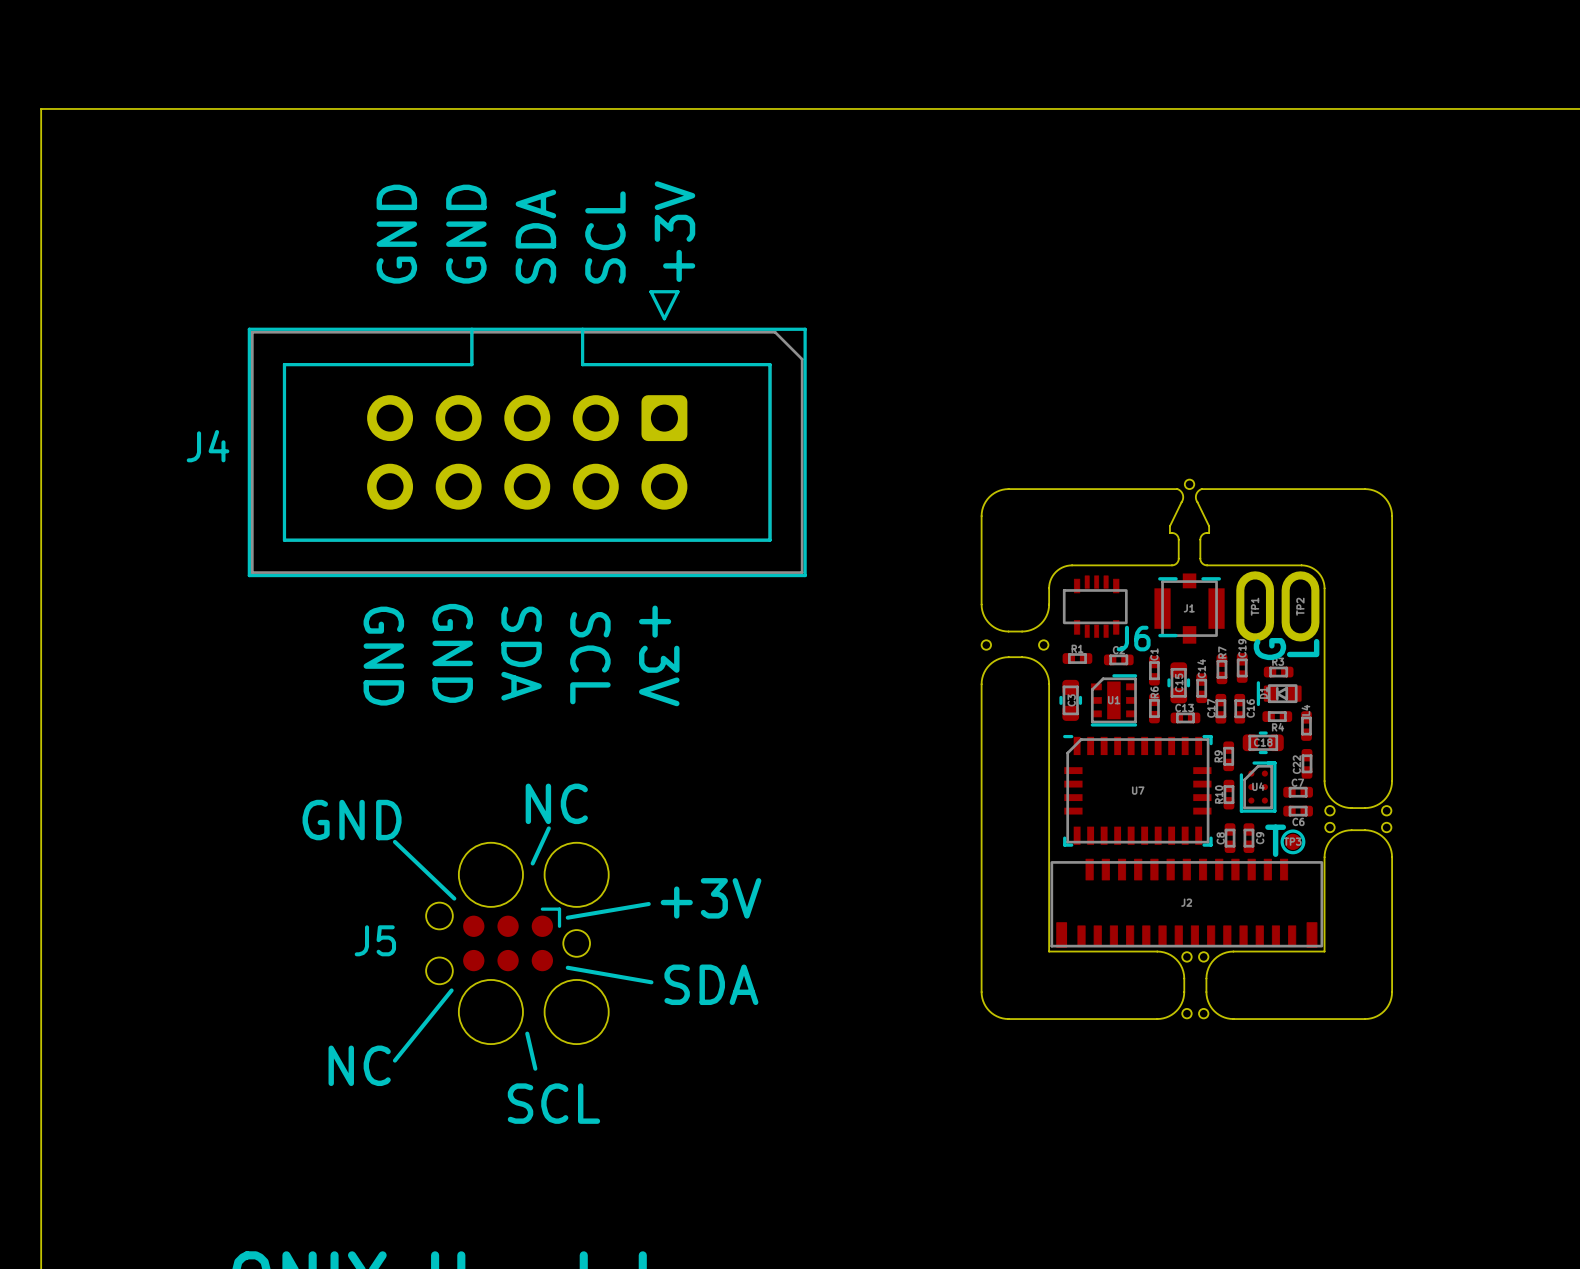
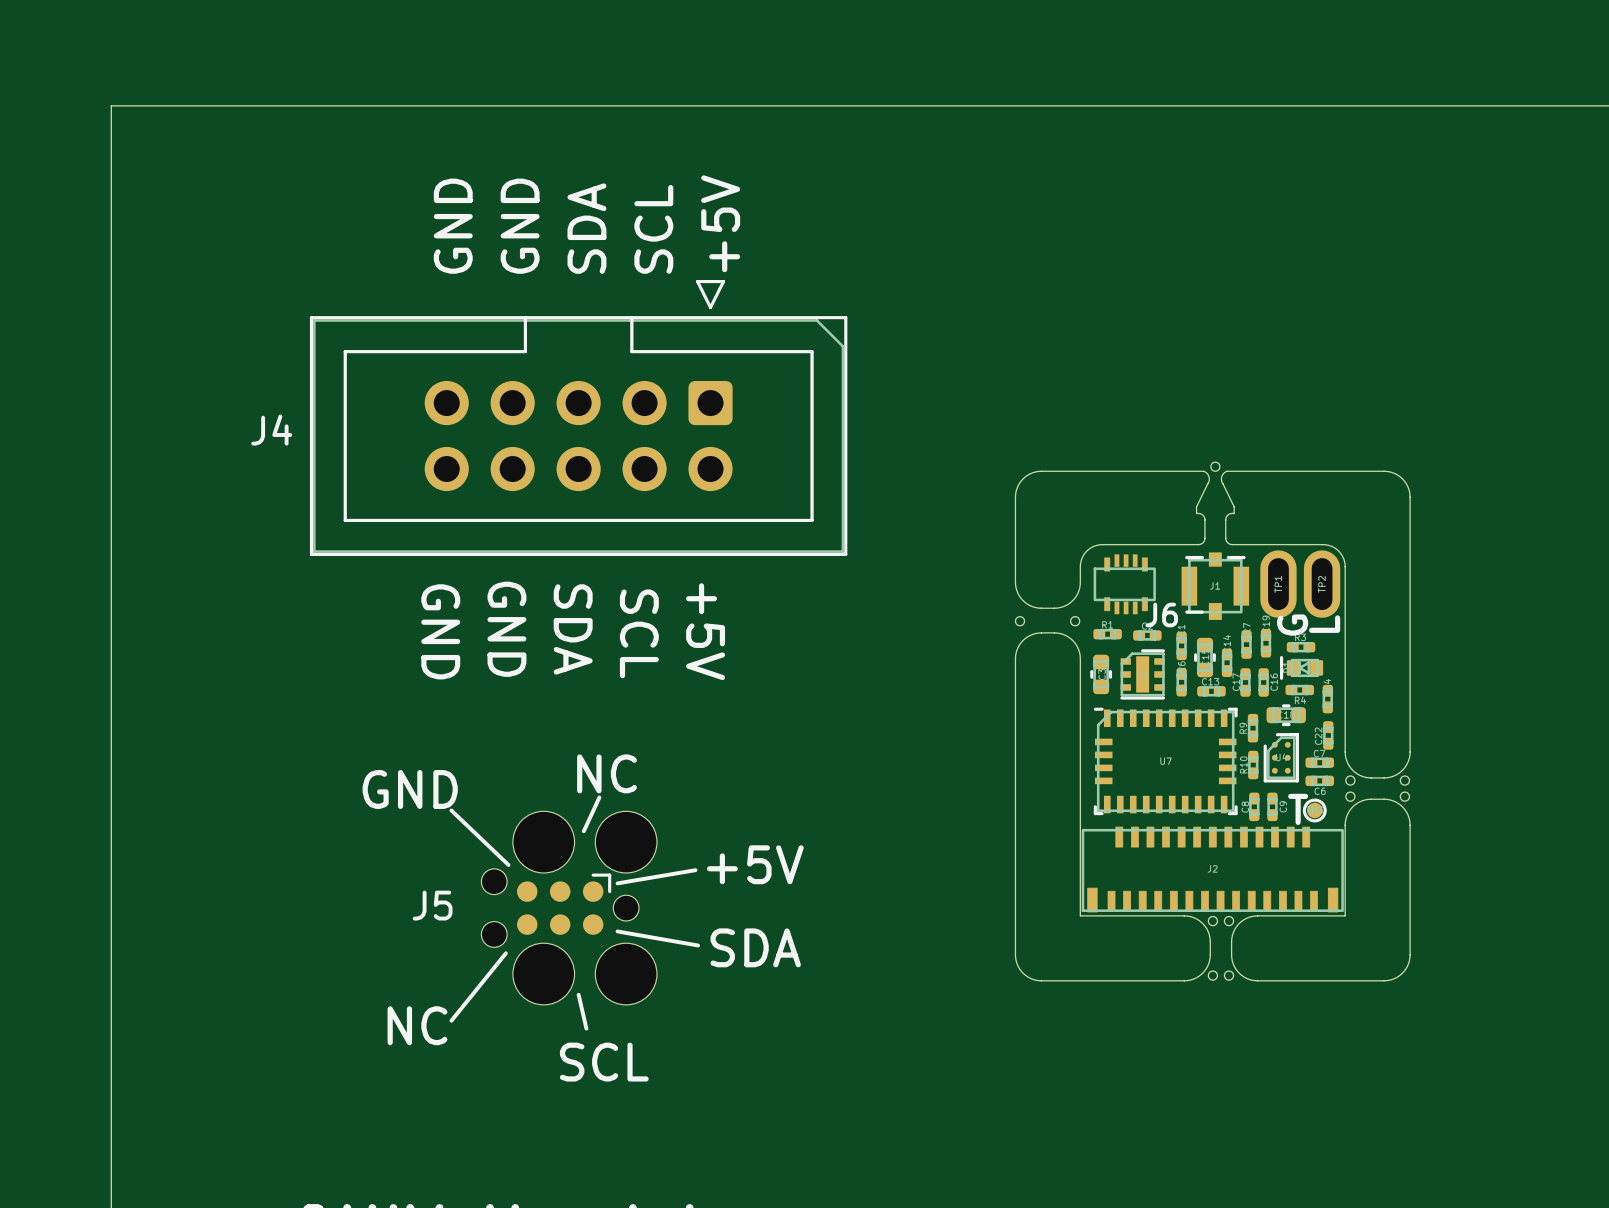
text: +3V (674, 231) -> +5V (720, 223)
text: +3V (659, 655) -> +5V (705, 631)
text: +3V (711, 898) -> +5V (755, 864)

